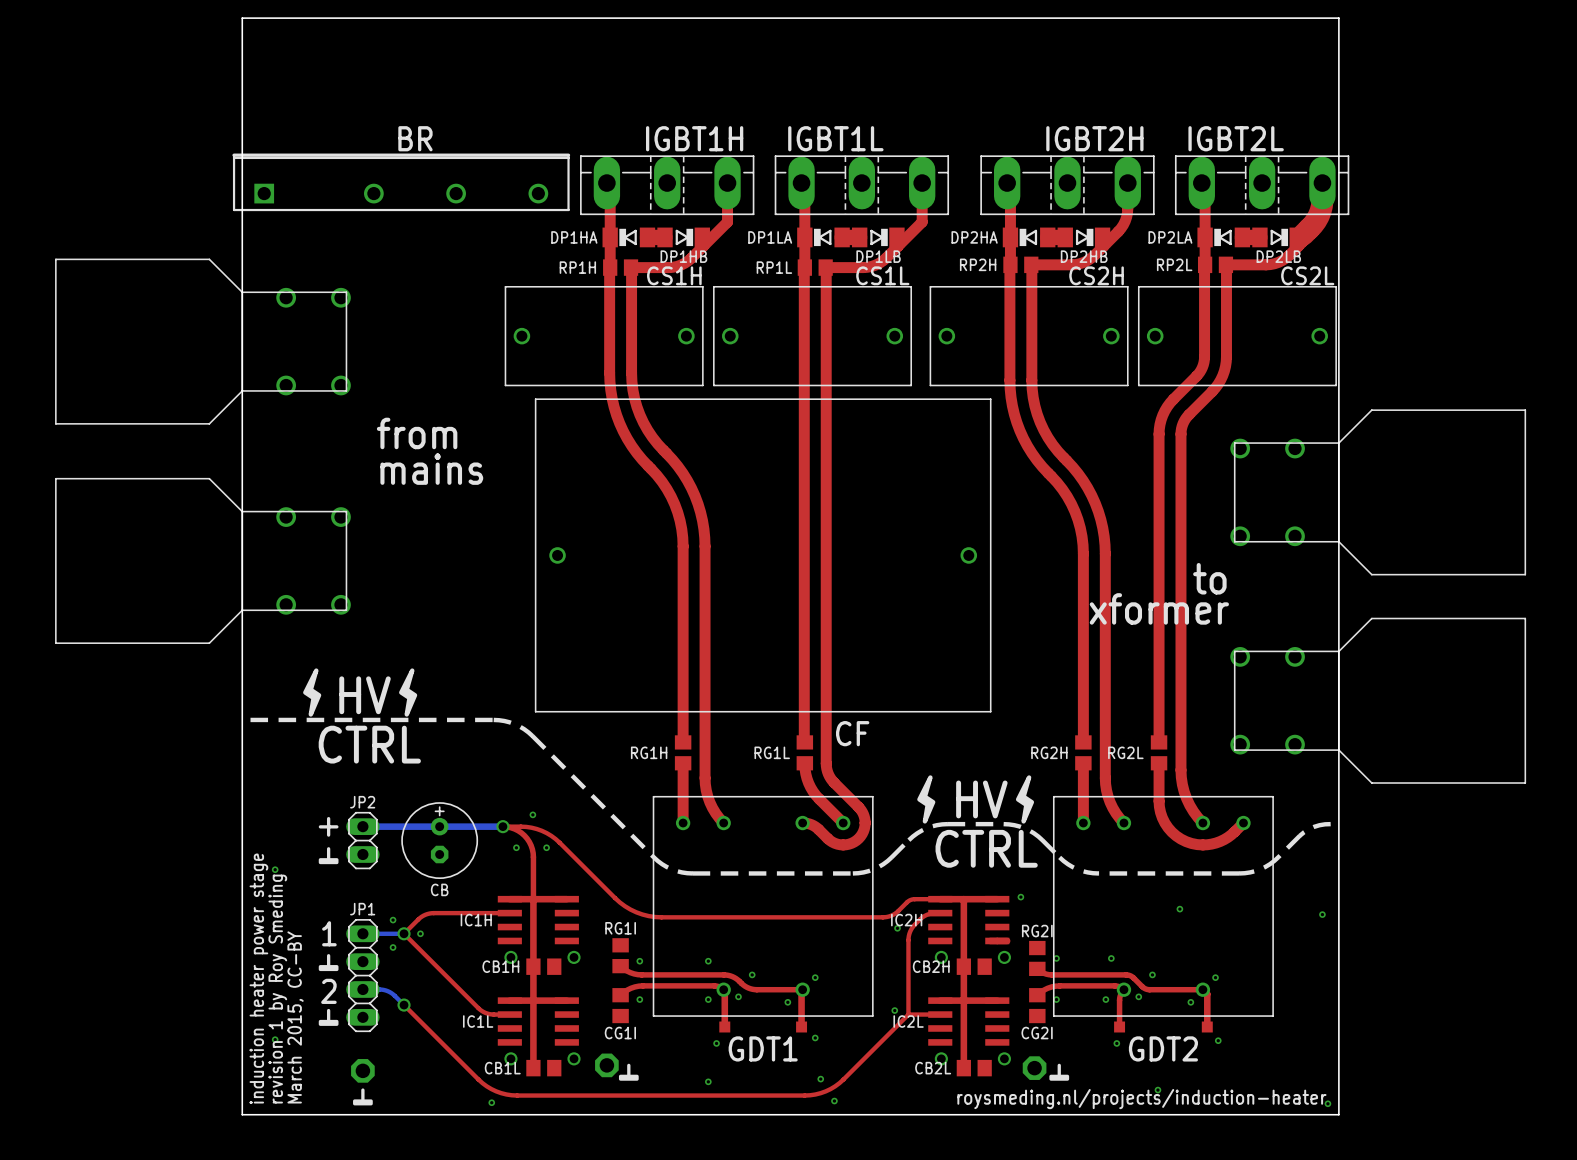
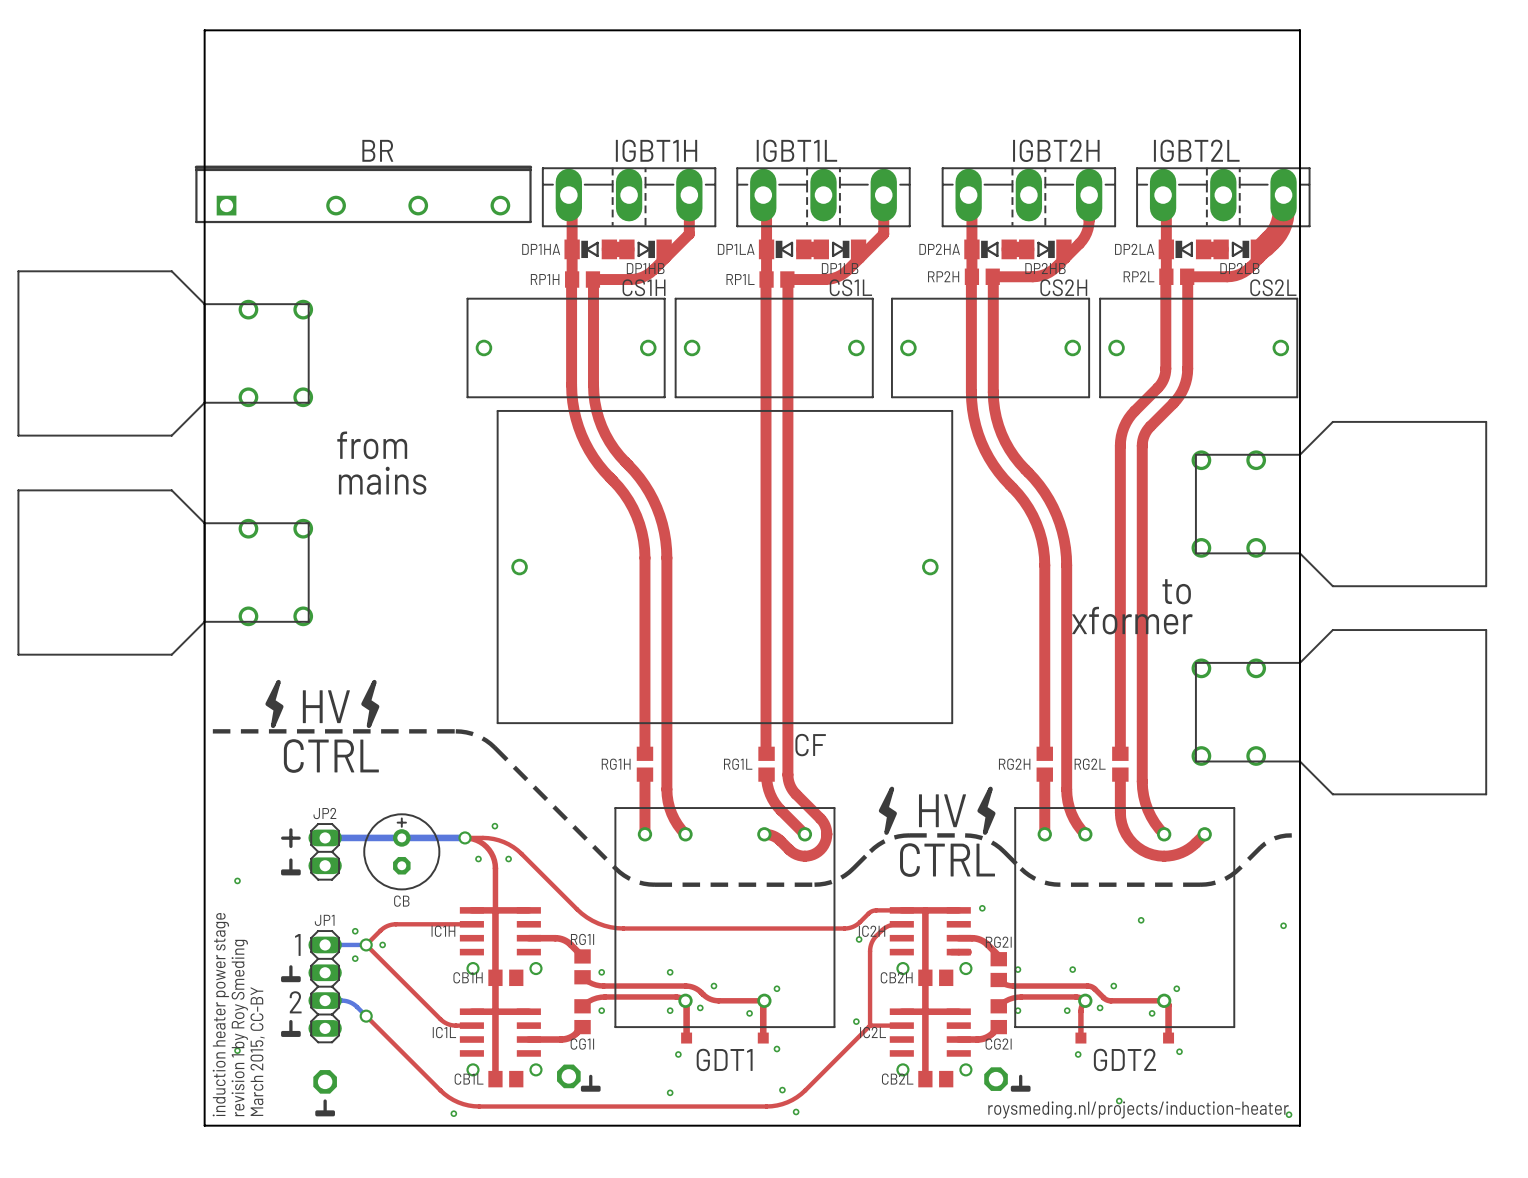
top track: none -> (528, 938) (561, 939) (569, 943) (582, 956)
top track: none -> (958, 938) (974, 938) (982, 940) (998, 955) (998, 959)
top track: none -> (582, 1027) (573, 1035) (565, 1039) (528, 1039)
top track: none -> (998, 1027) (983, 1038) (958, 1039)

